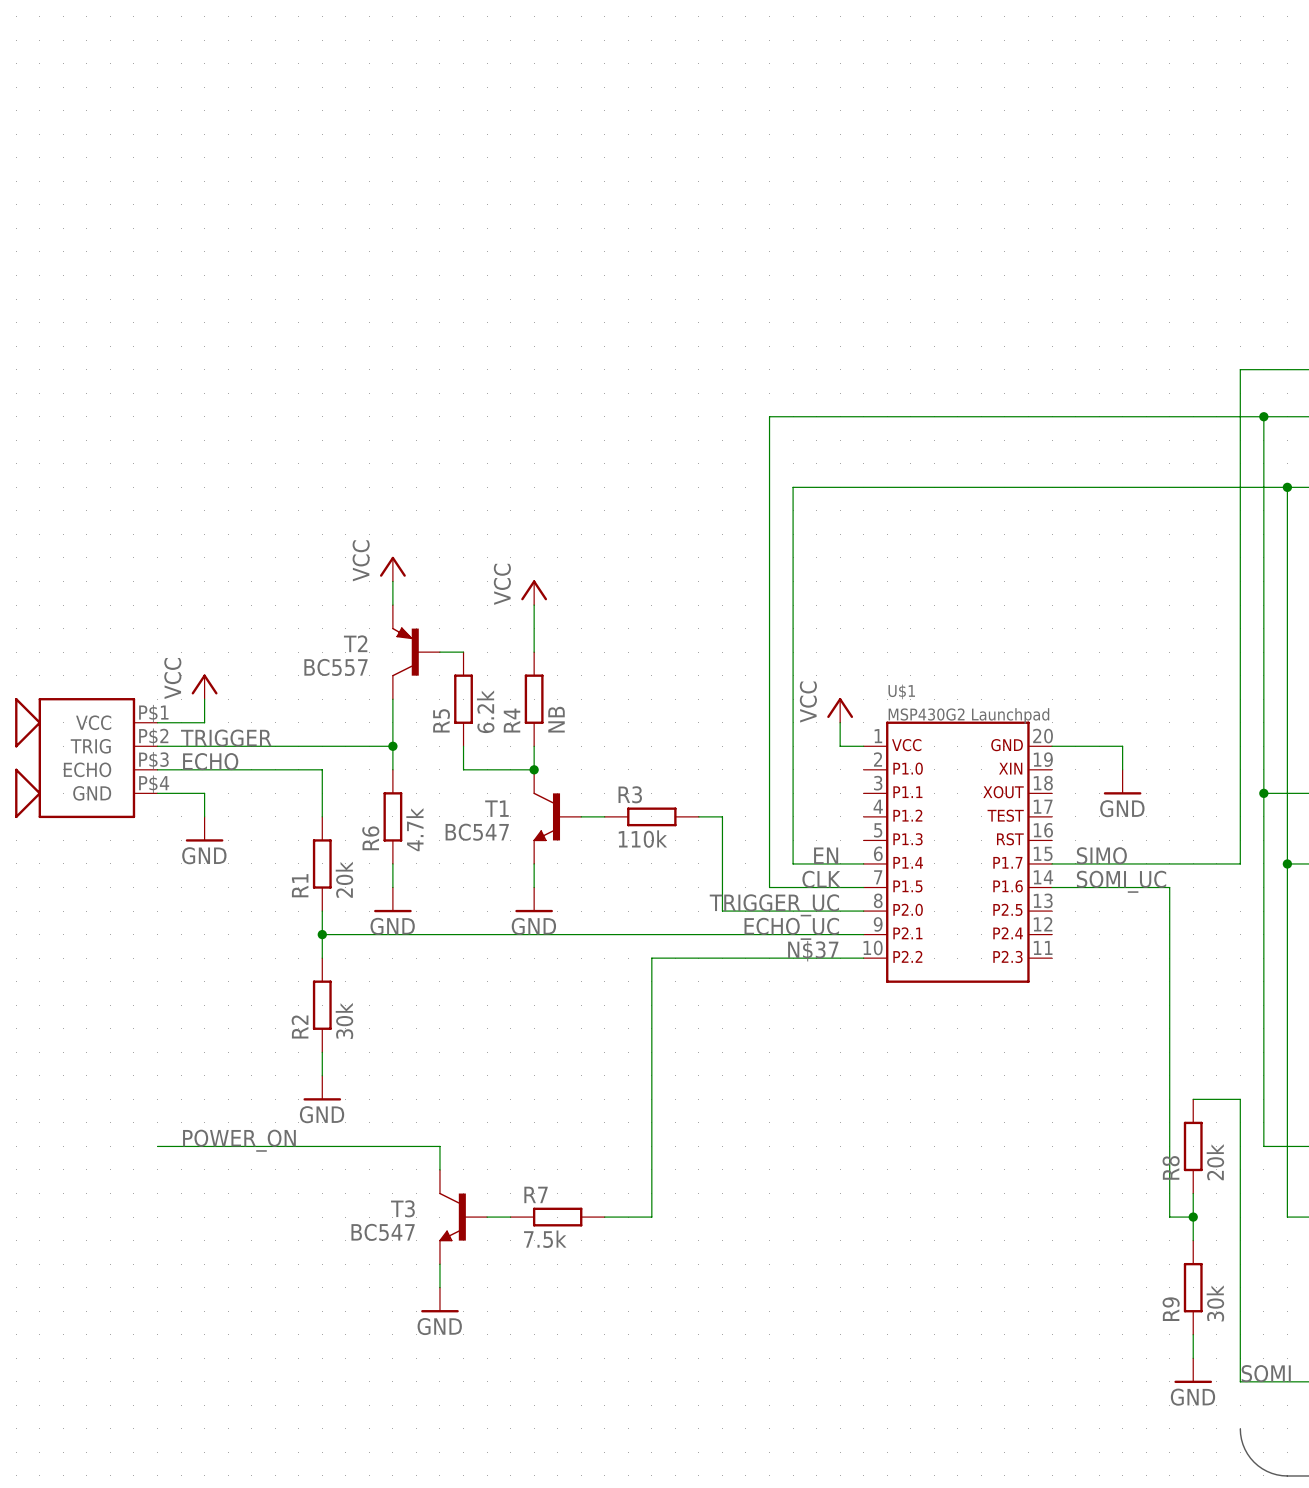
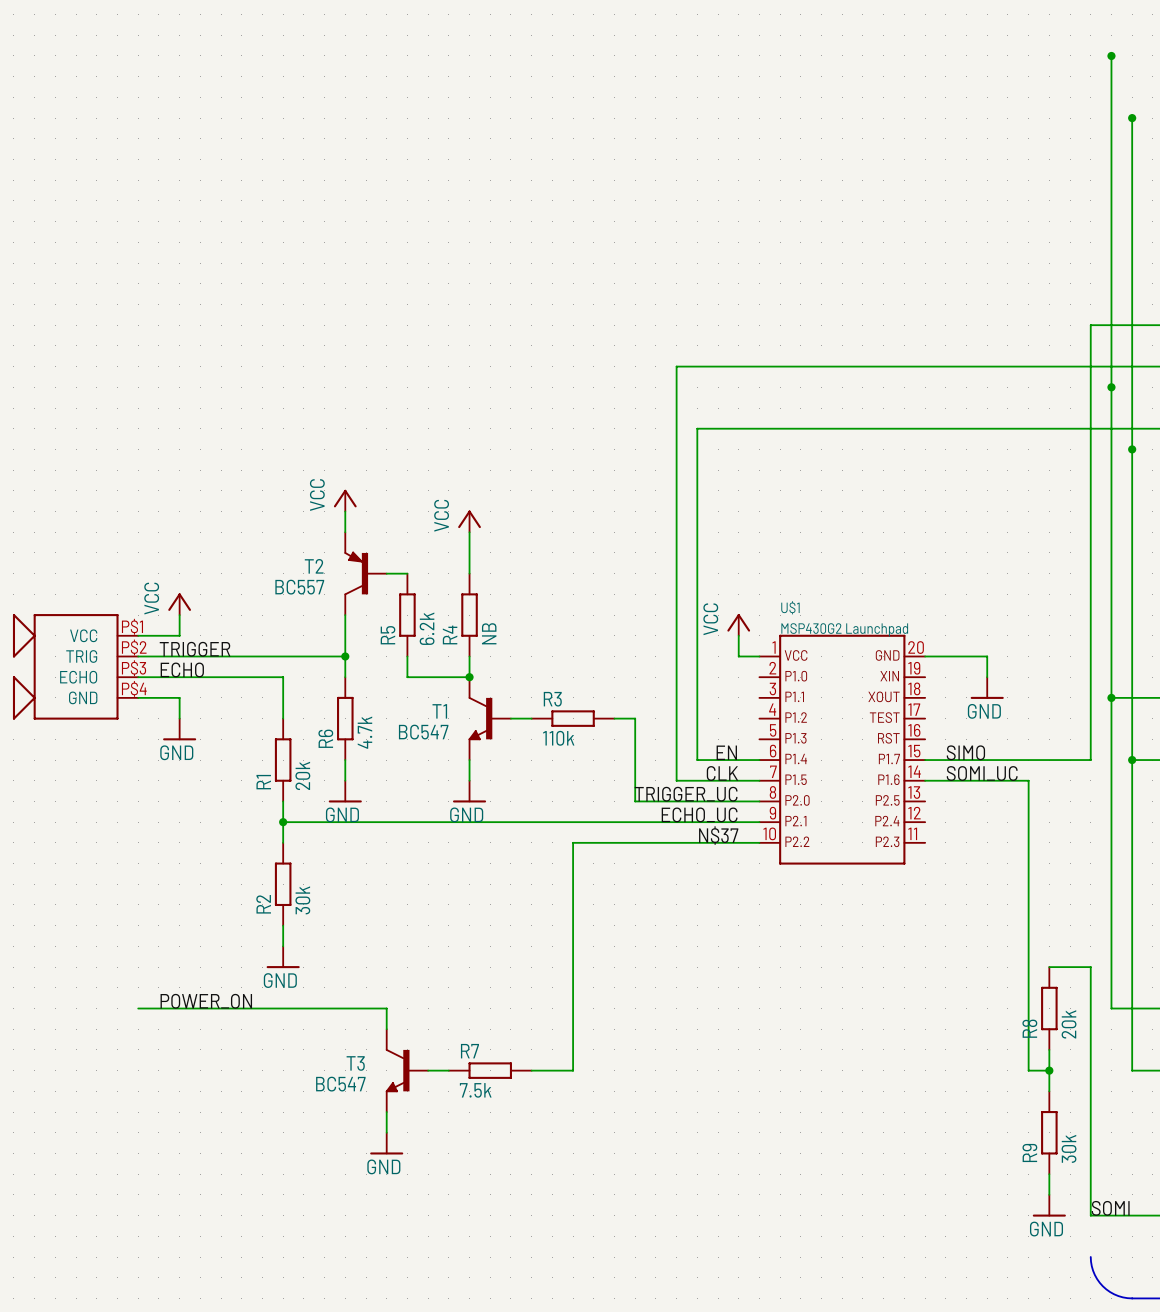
wire: none -> (1111, 55) (1111, 366)
junction: none -> (1111, 55)
wire: none -> (1132, 118) (1132, 428)
junction: none -> (1132, 118)
junction position: (1263, 416) -> (1111, 387)
junction position: (1287, 487) -> (1132, 449)

